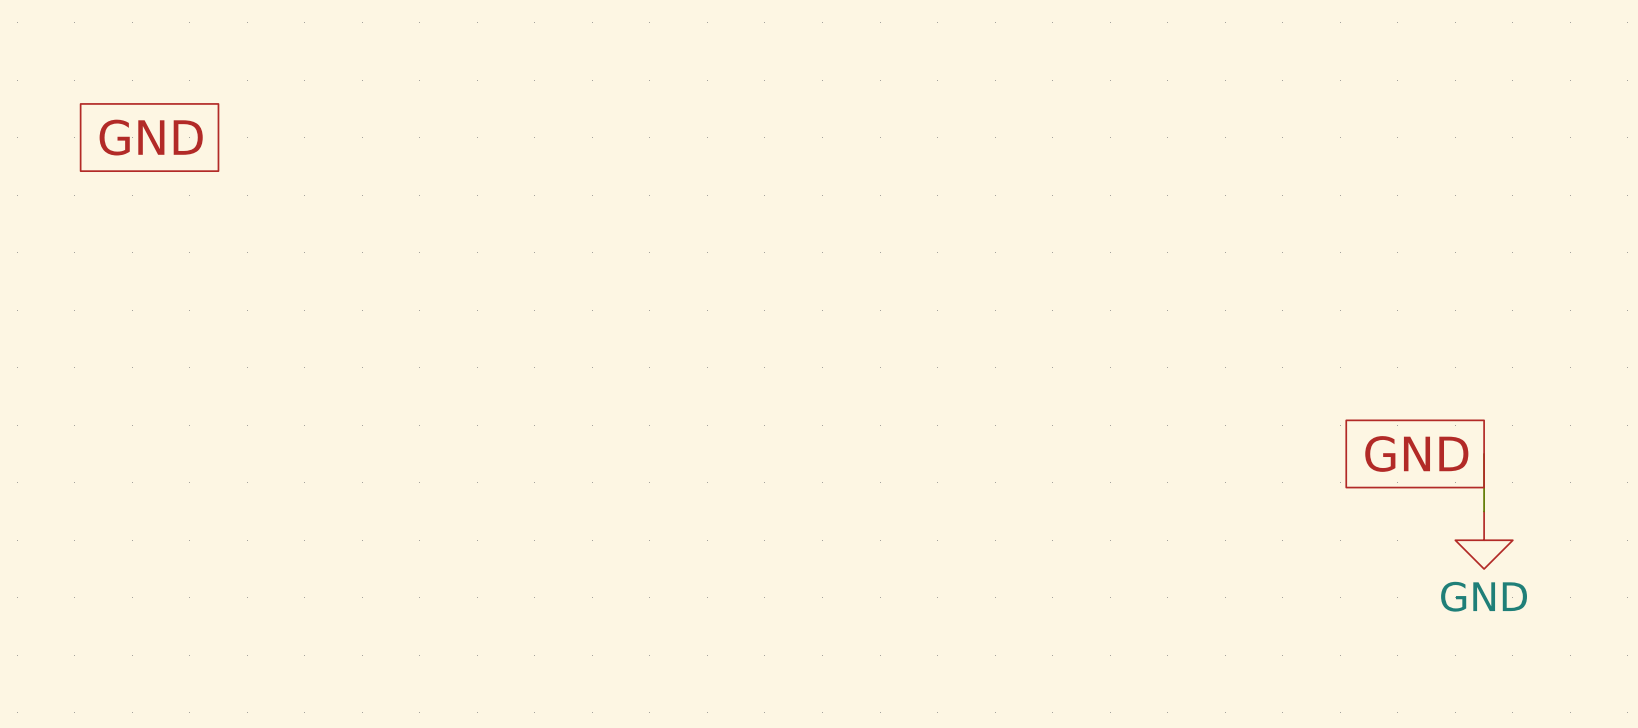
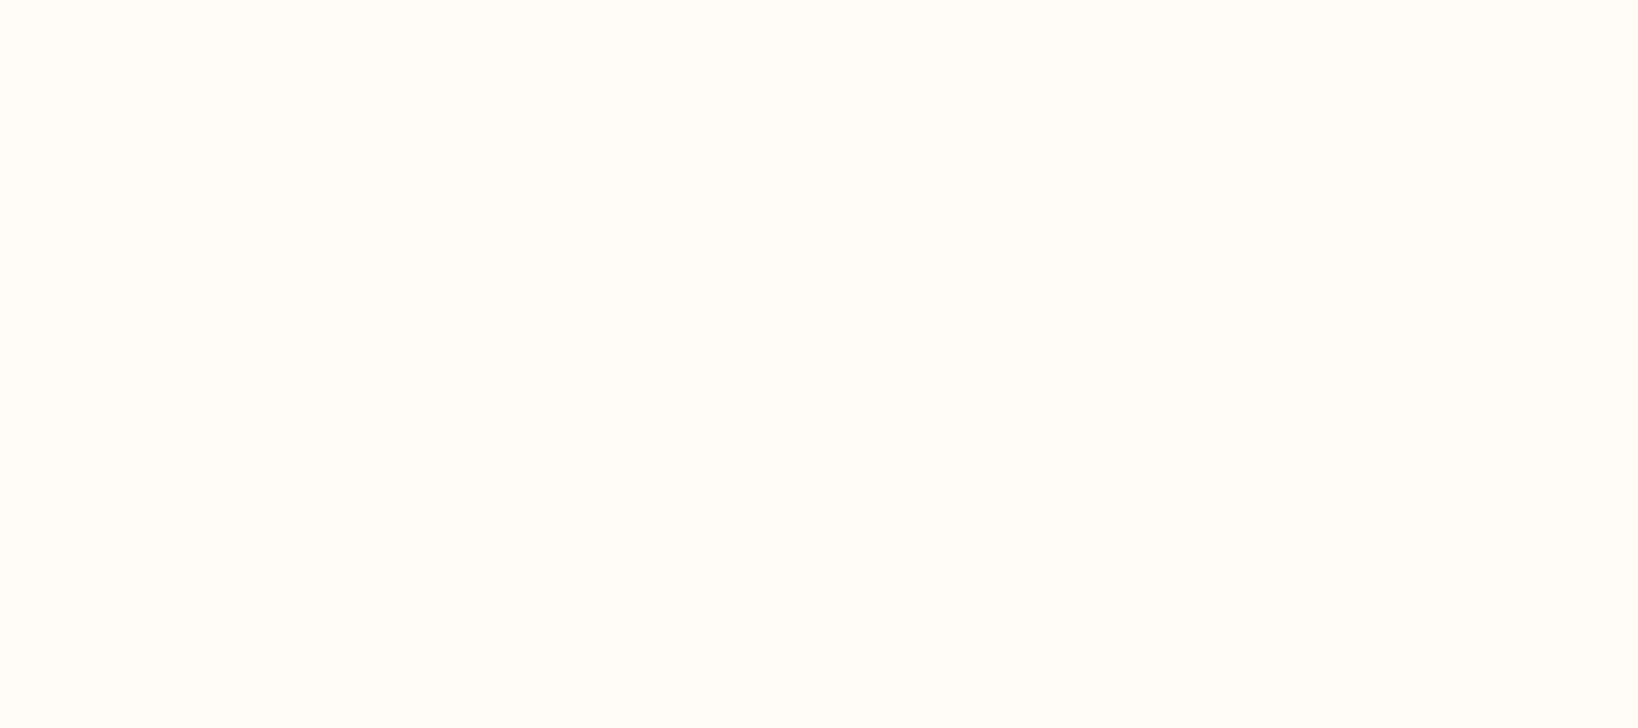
global label: GND (151, 137) -> none
global label: GND (1416, 453) -> none
wire: (1484, 453) (1484, 511) -> none
power symbol: GND (1484, 540) -> none

